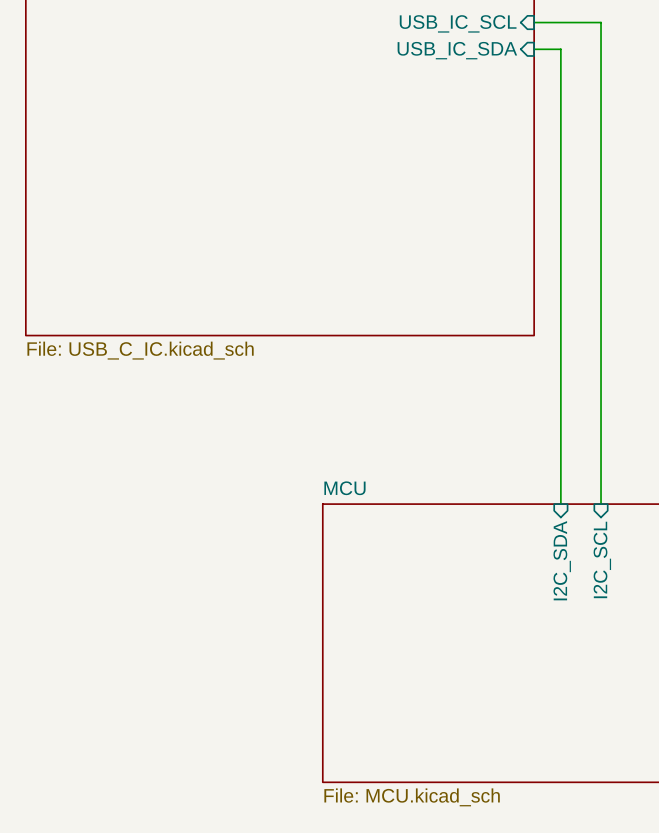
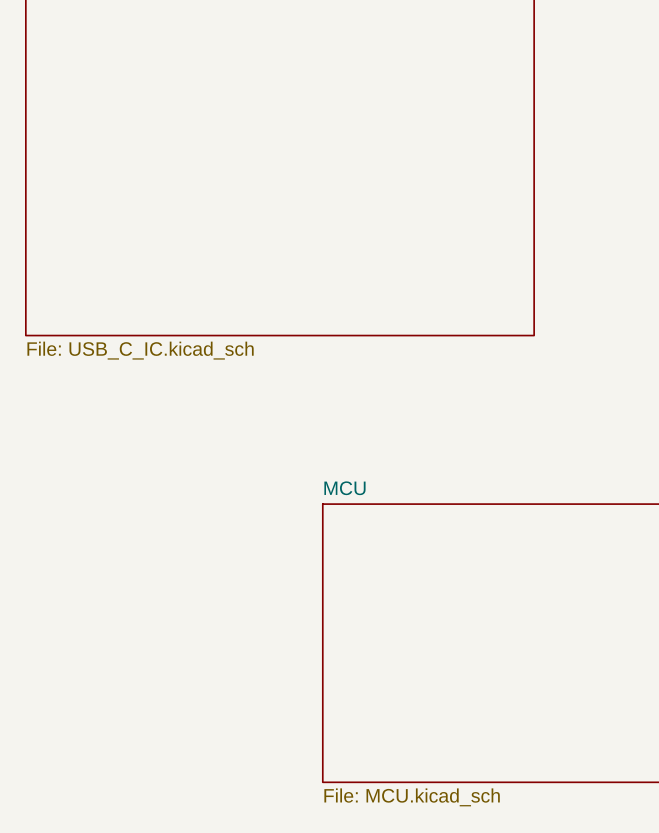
wire: (534, 22) (601, 22) (601, 504) -> none
sheet pin: USB_IC_SCL (458, 23) -> none
wire: (534, 49) (560, 49) (560, 504) -> none
sheet pin: USB_IC_SDA (457, 50) -> none
sheet pin: I2C_SCL (602, 559) -> none
sheet pin: I2C_SDA (562, 560) -> none

